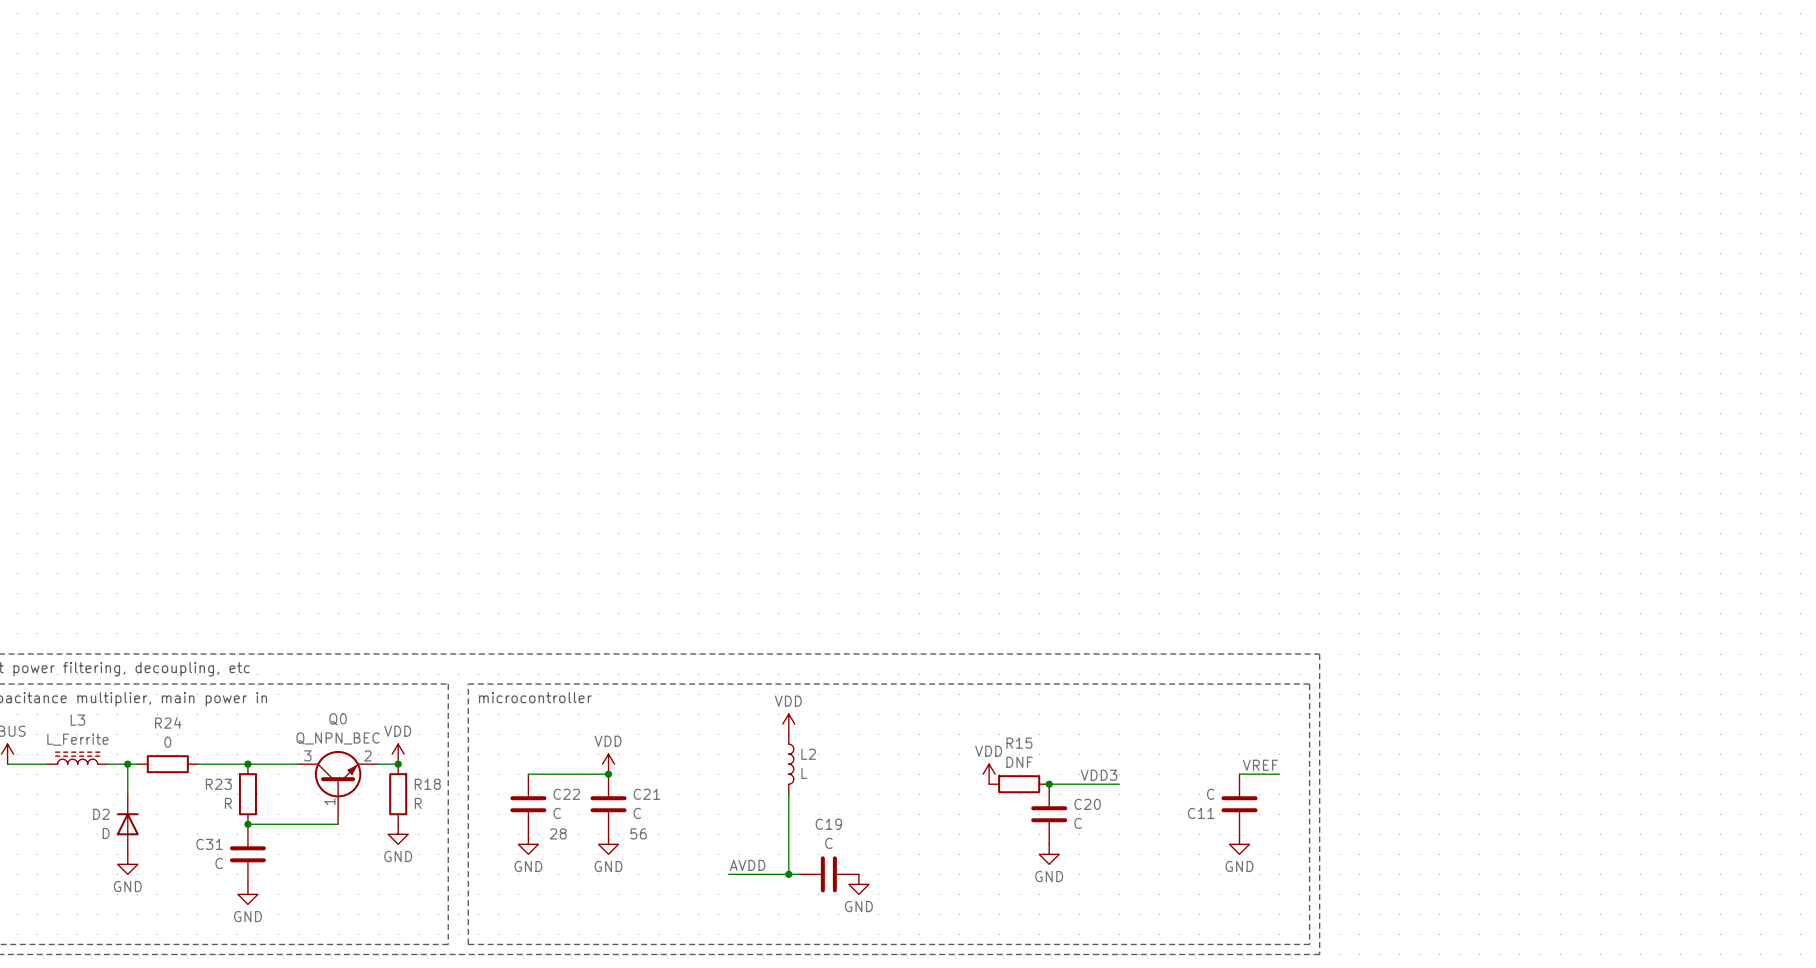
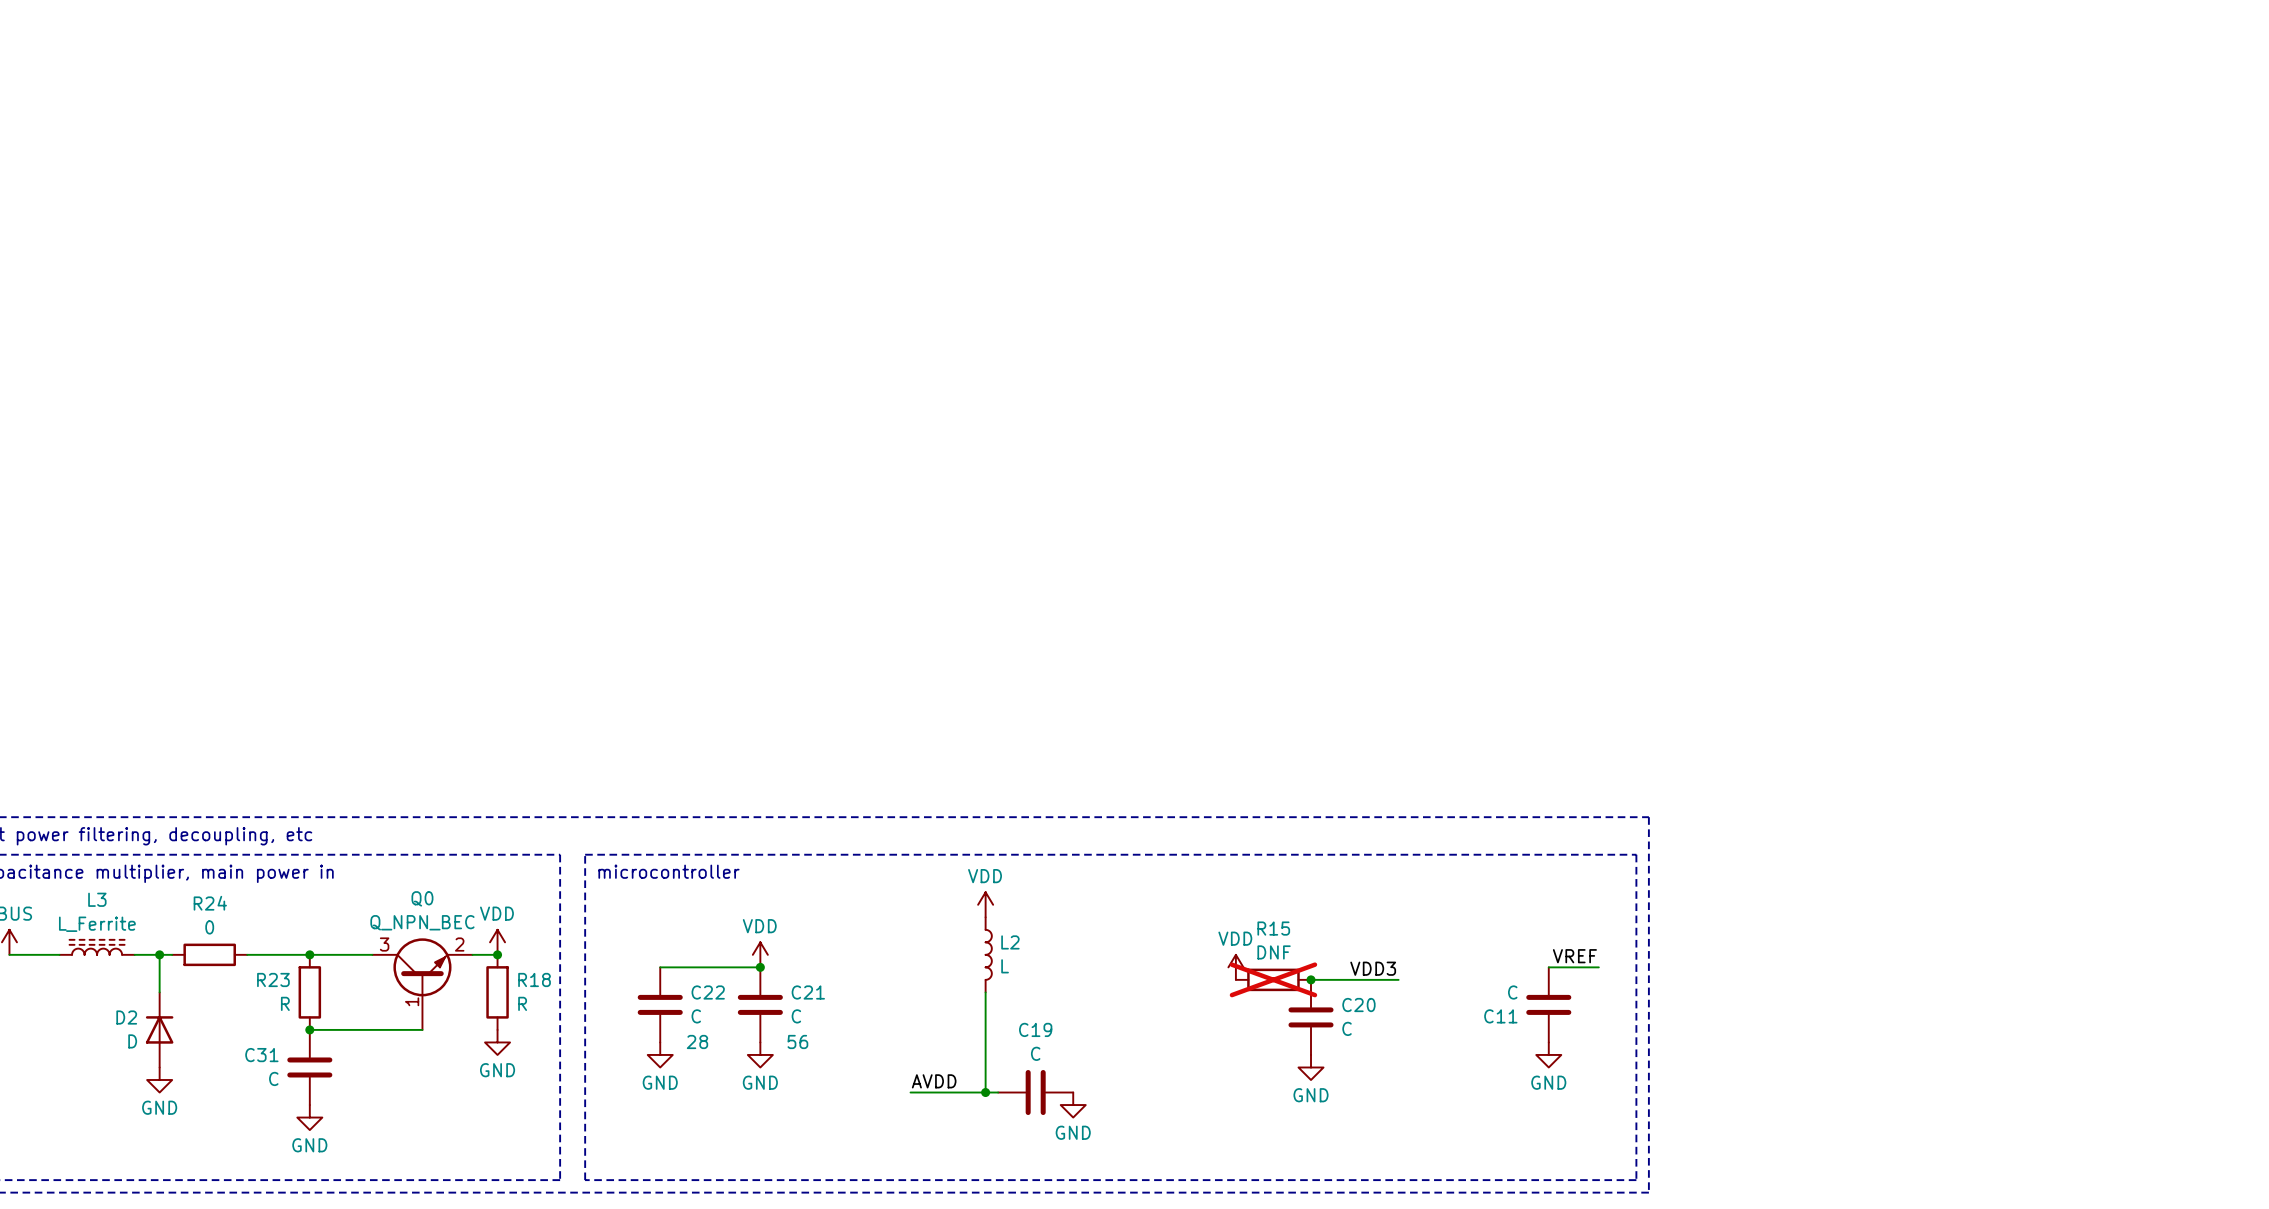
R15 do-not-place cross: none -> (1273, 979)

